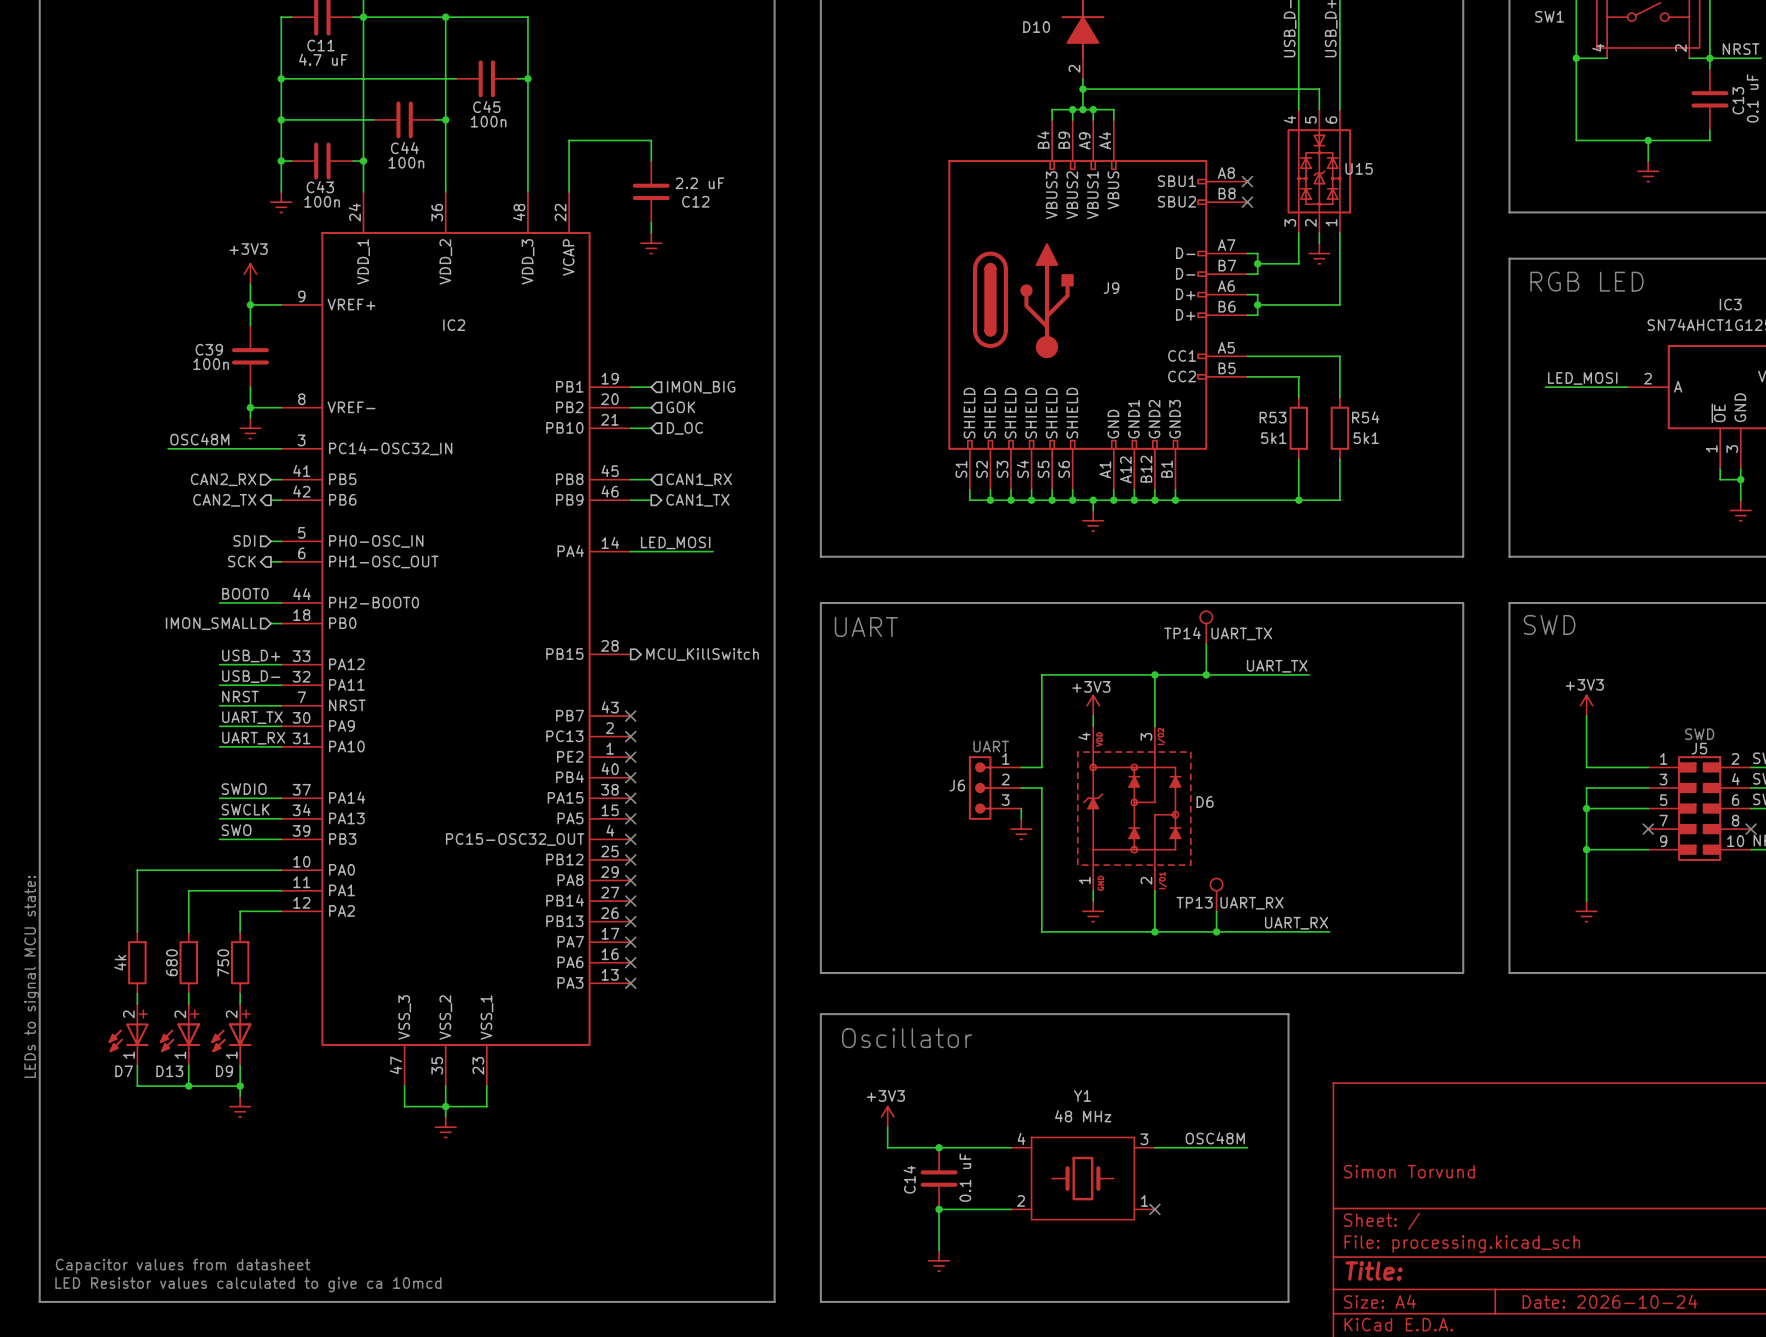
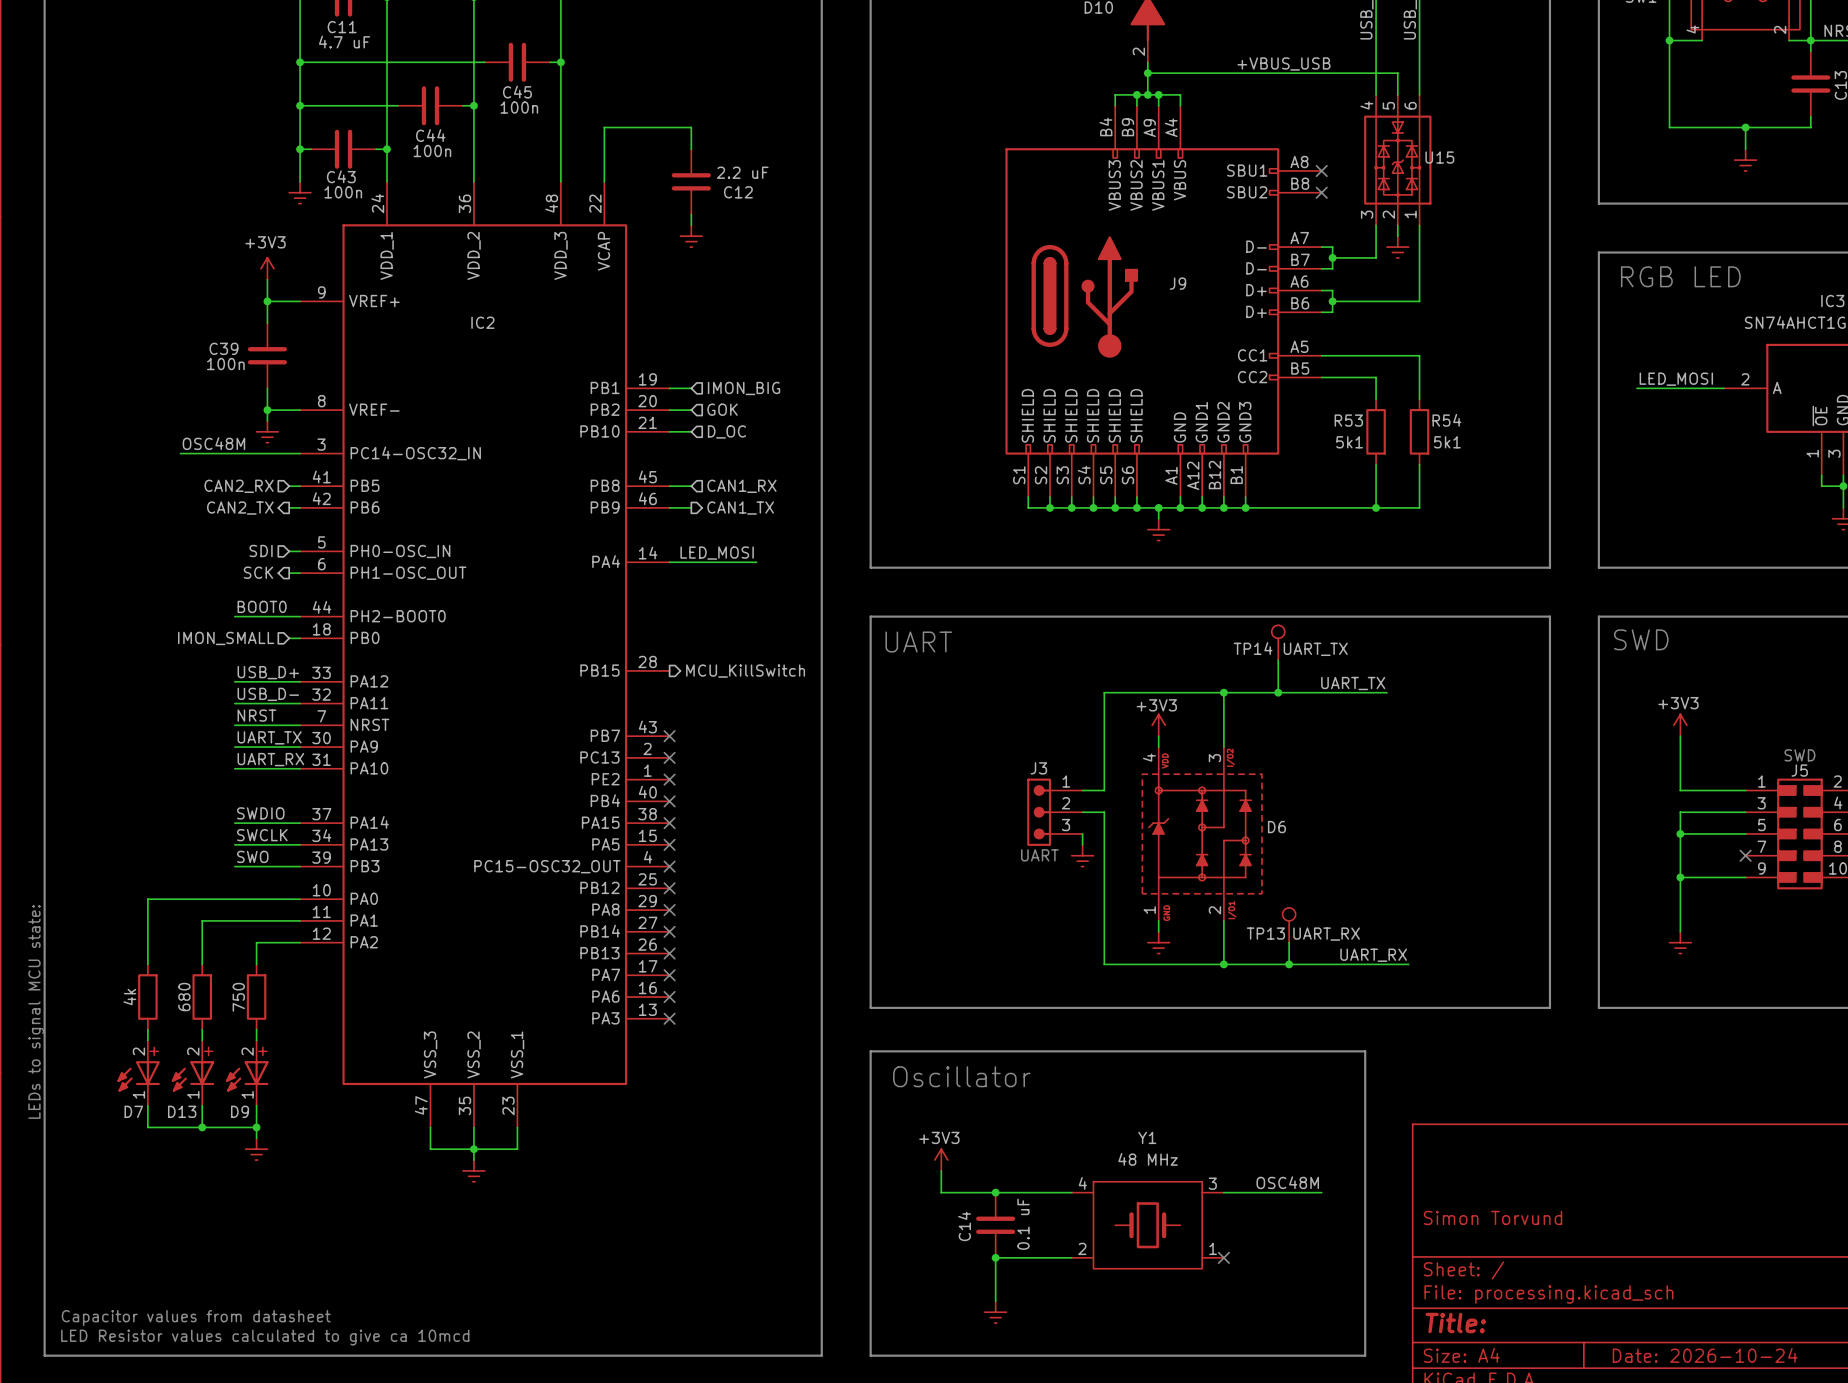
label: none -> +VBUS_USB (1284, 63)
text position: UART (991, 746) -> UART (1039, 855)
J6 name: J6 (957, 785) -> J3 (1038, 768)

